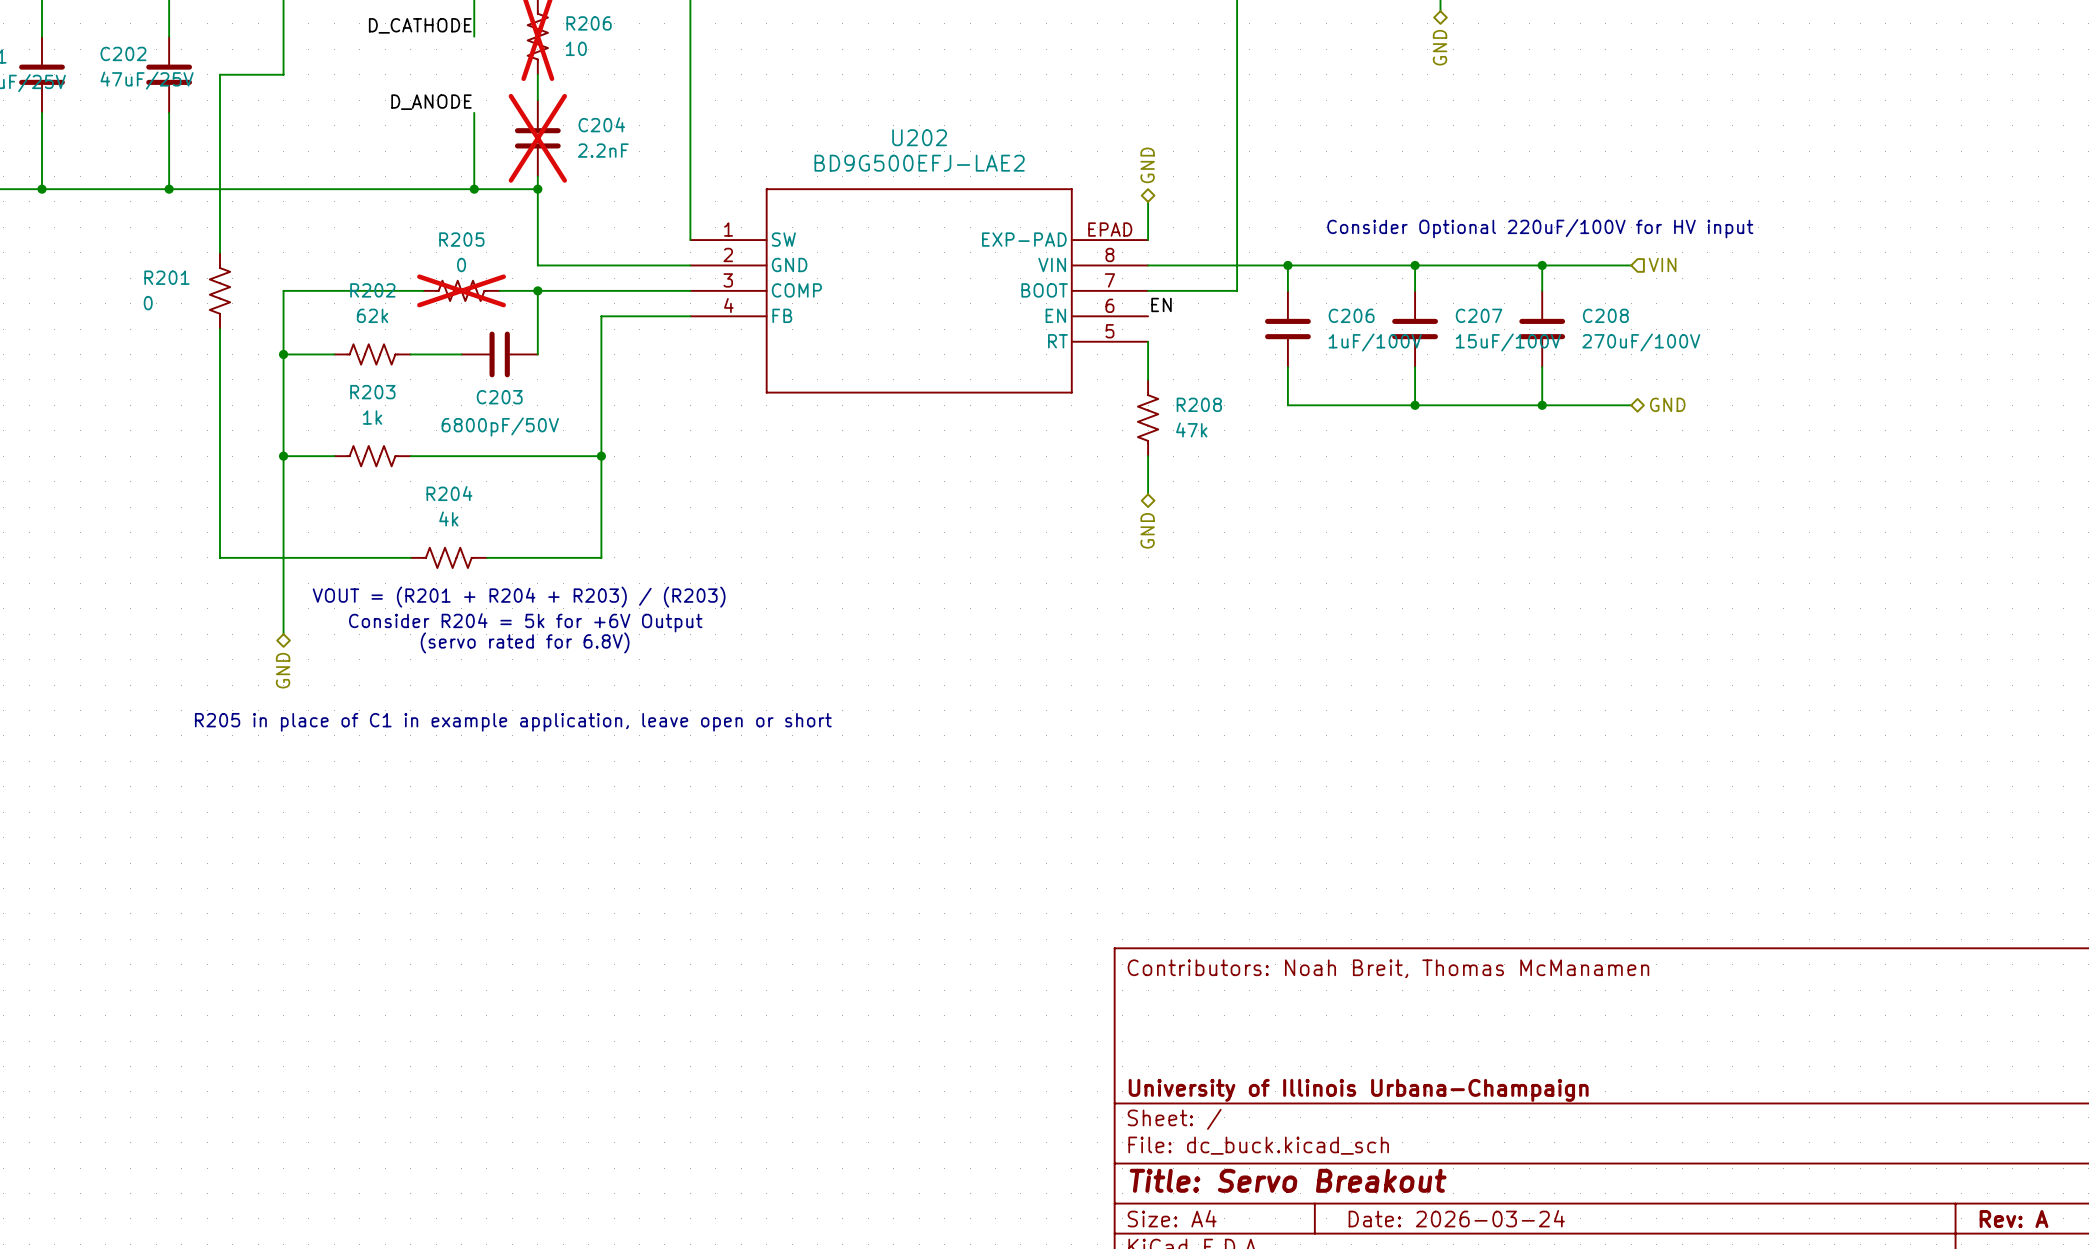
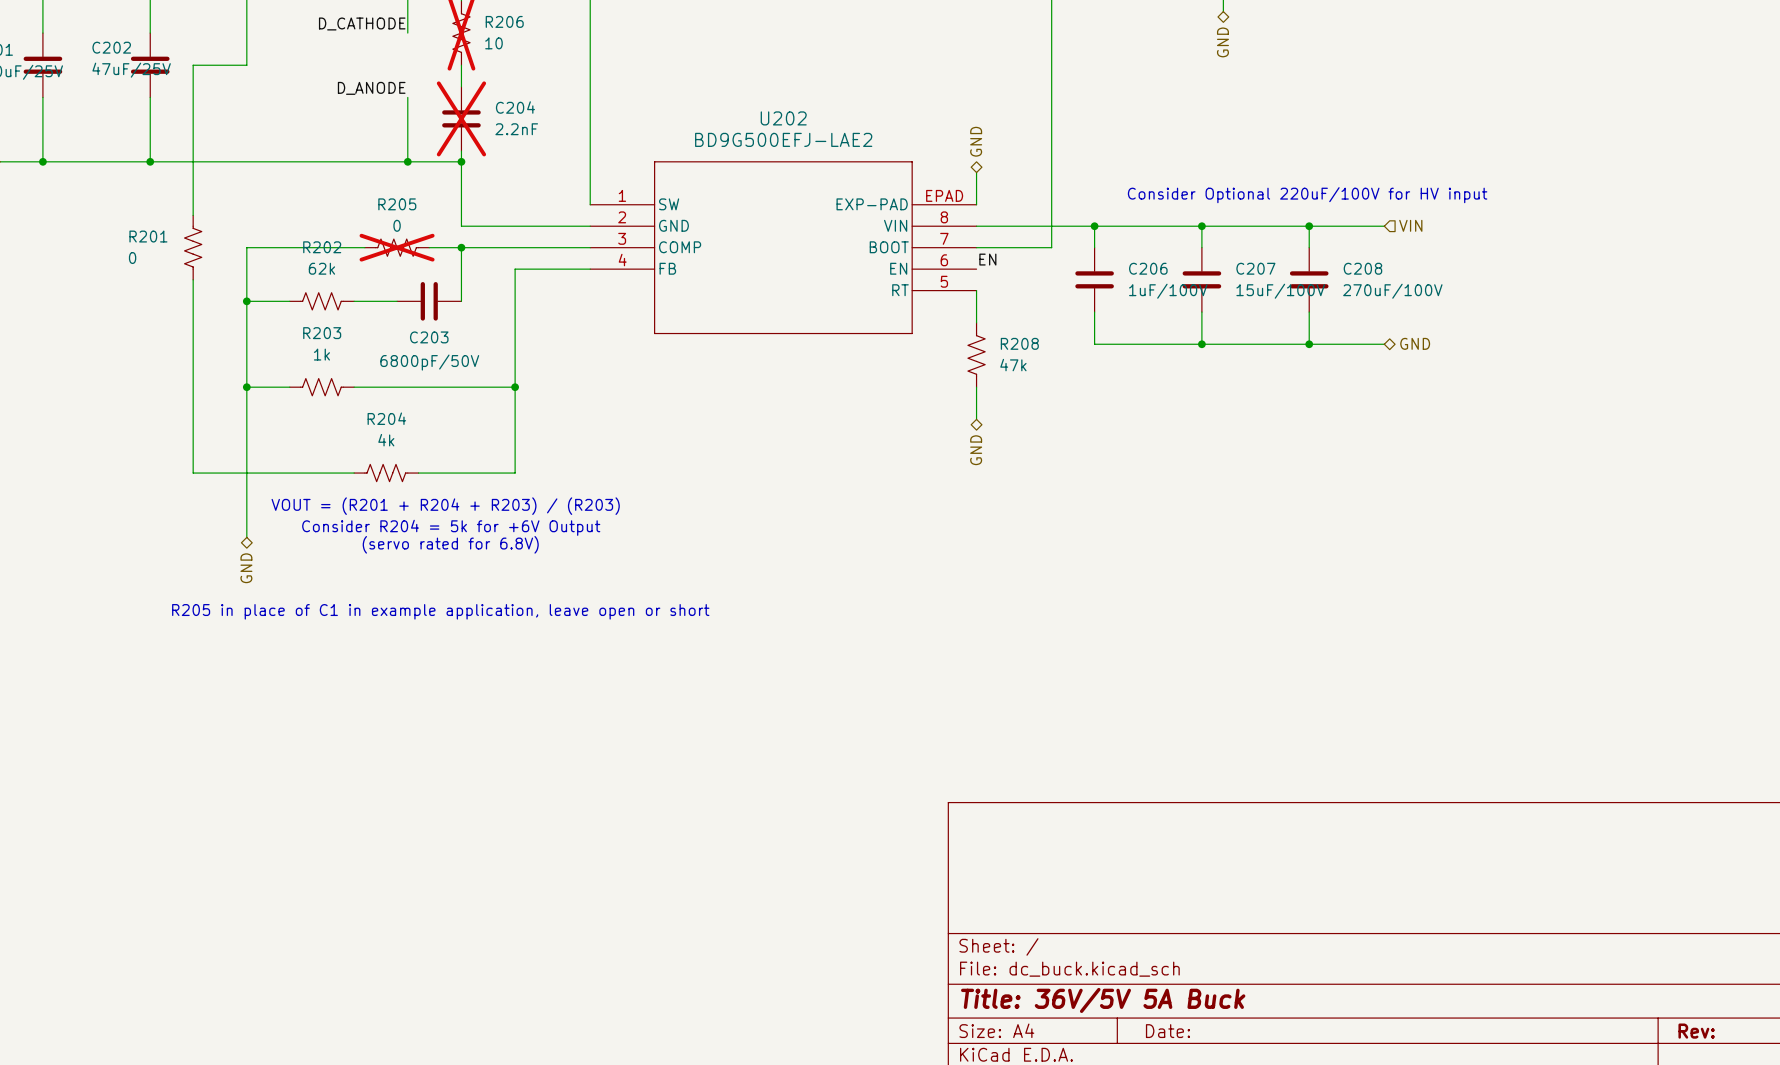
title block: Contributors: Noah Breit, Thomas McManamen (1388, 968) -> none
title block: University of Illinois Urbana-Champaign (1358, 1090) -> none
title block: Title: Servo Breakout (1288, 1180) -> Title: 36V/5V 5A Buck (1103, 1000)
title block: Date: 2026-03-24 (1456, 1218) -> Date: (1167, 1031)
title block: Rev: A (2014, 1219) -> Rev: (1696, 1031)

